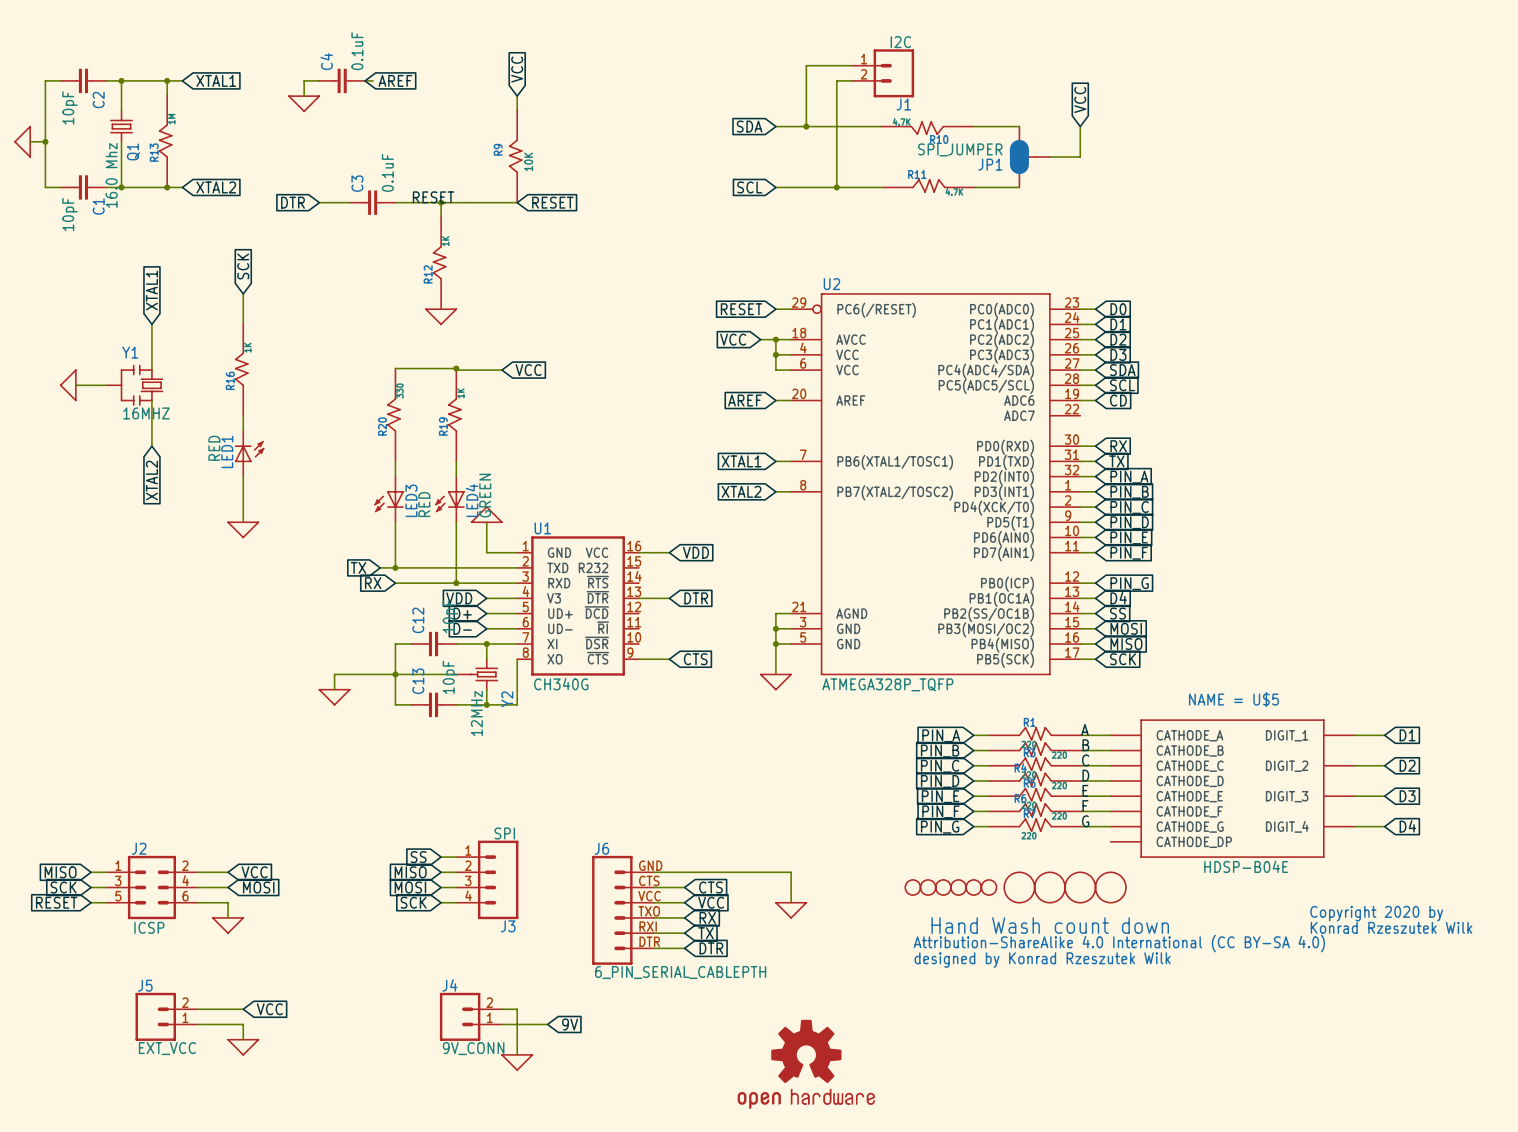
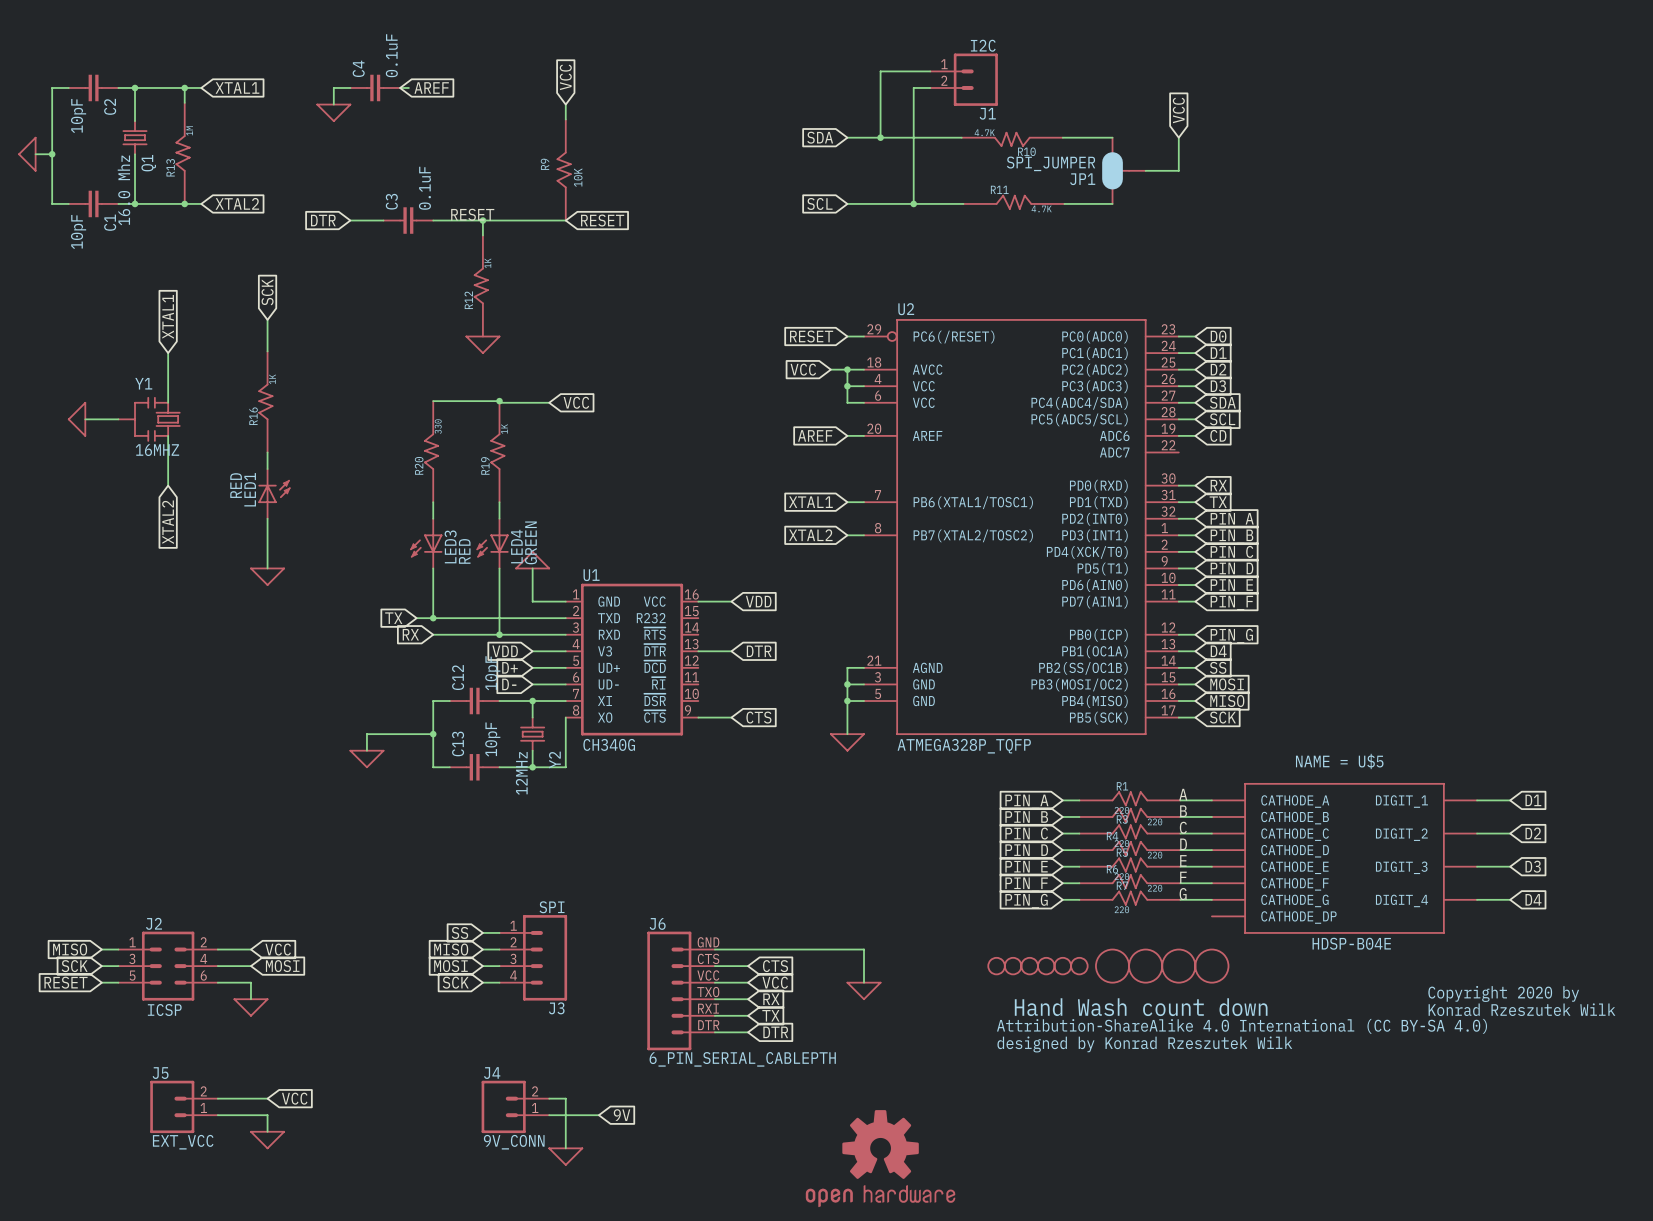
Y2 symbol: [456, 658, 499, 691] -> [520, 717, 546, 752]
wire: (395, 674) (456, 674) -> none

